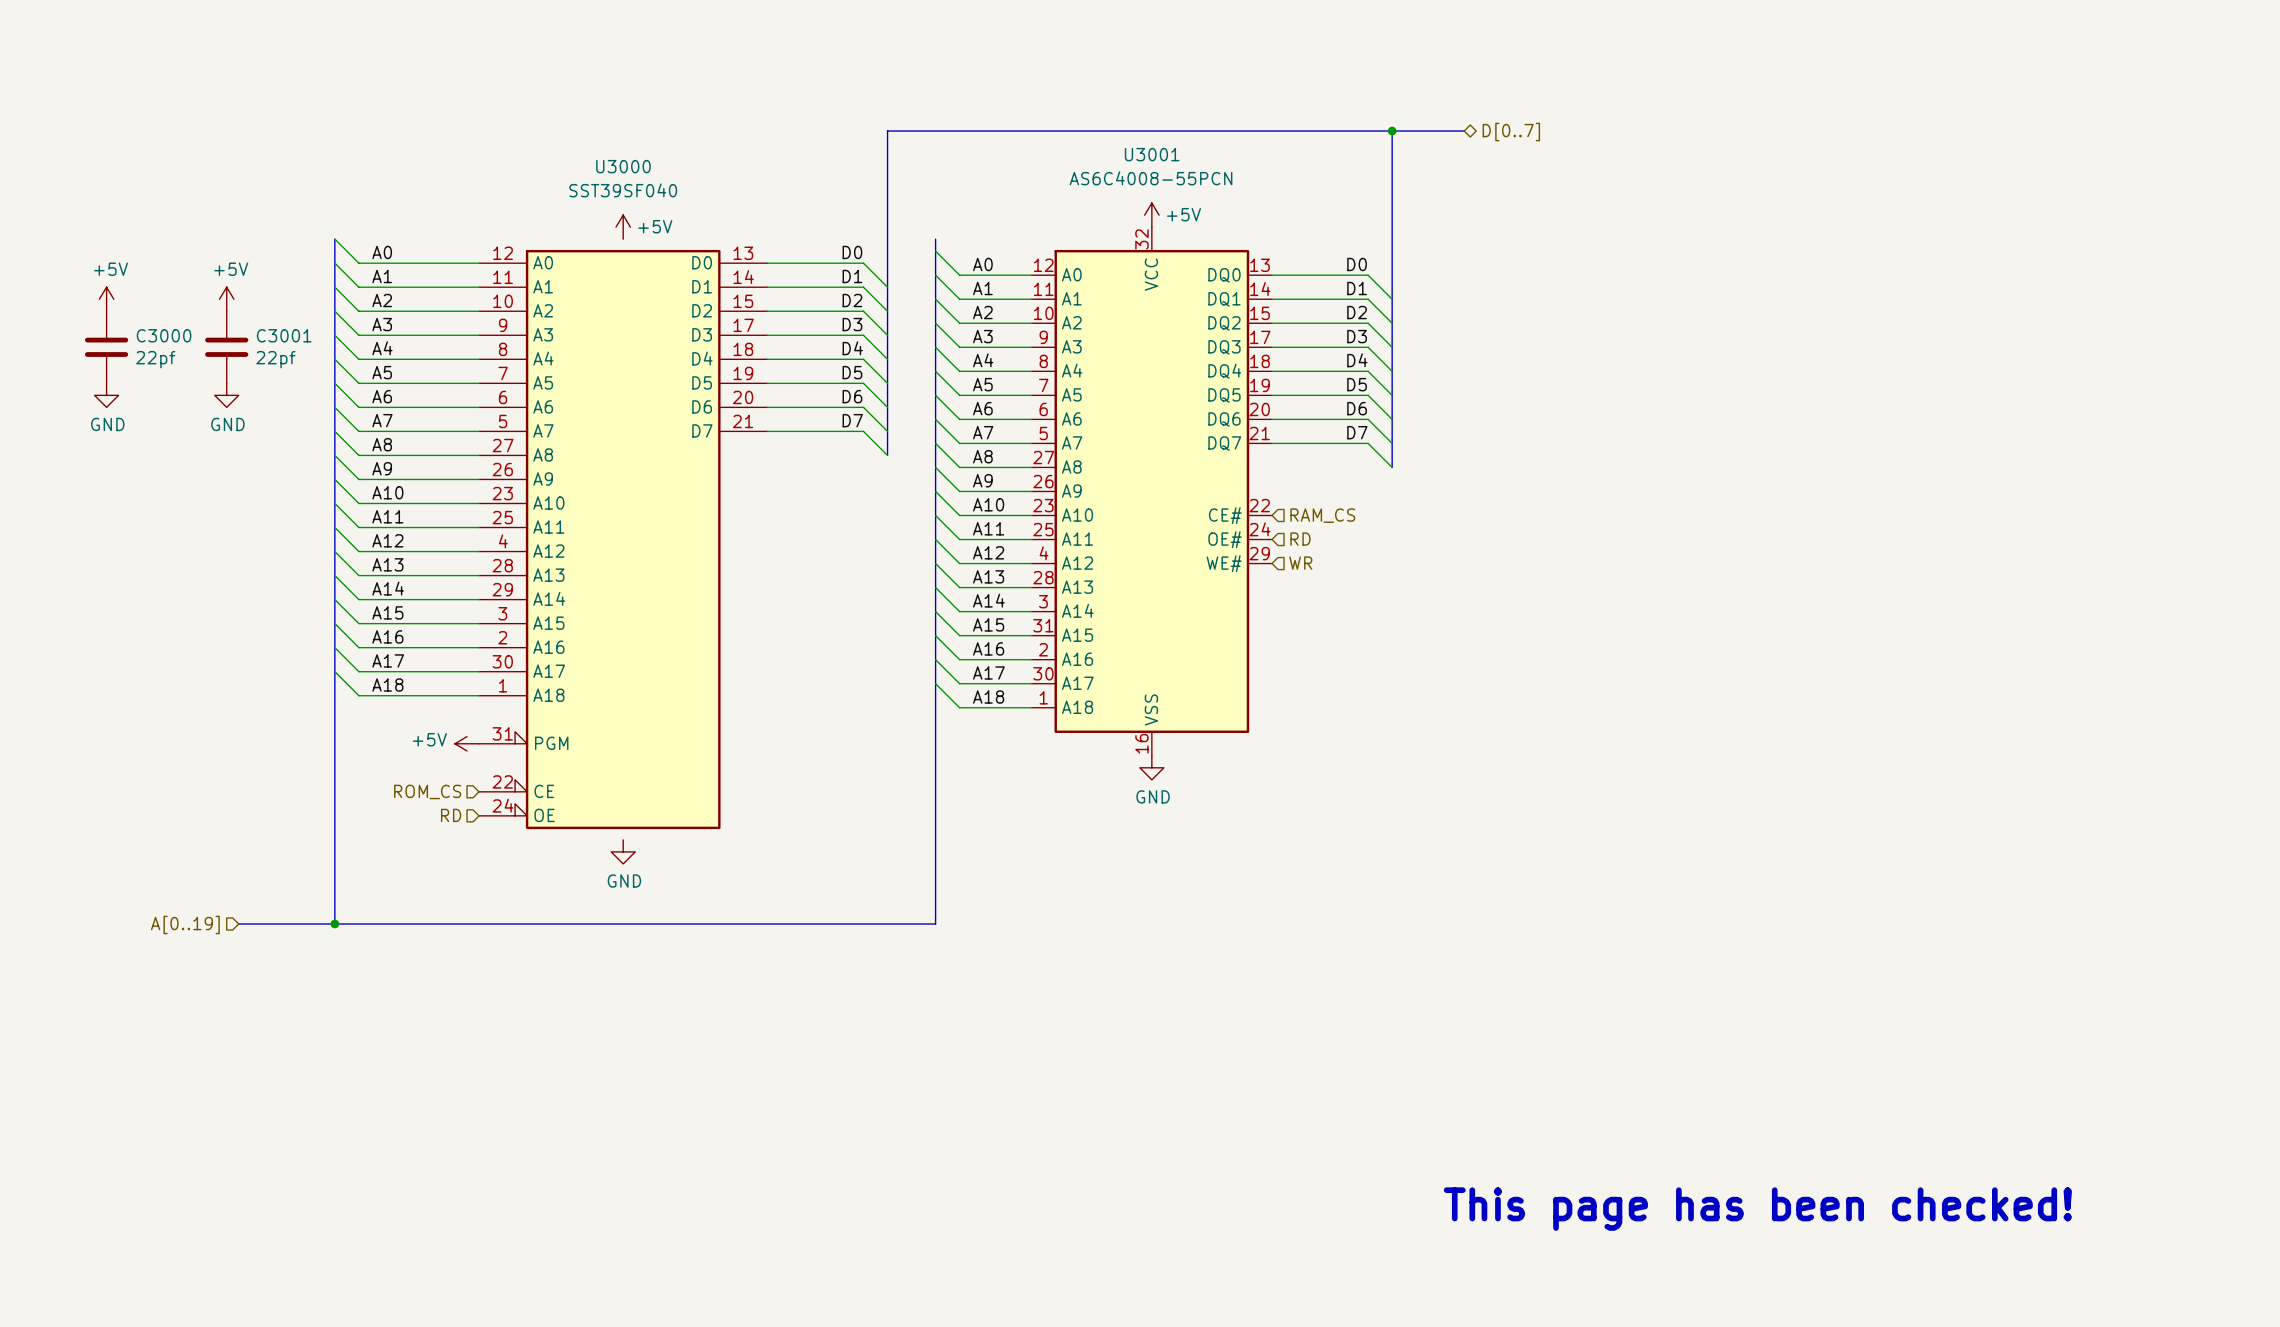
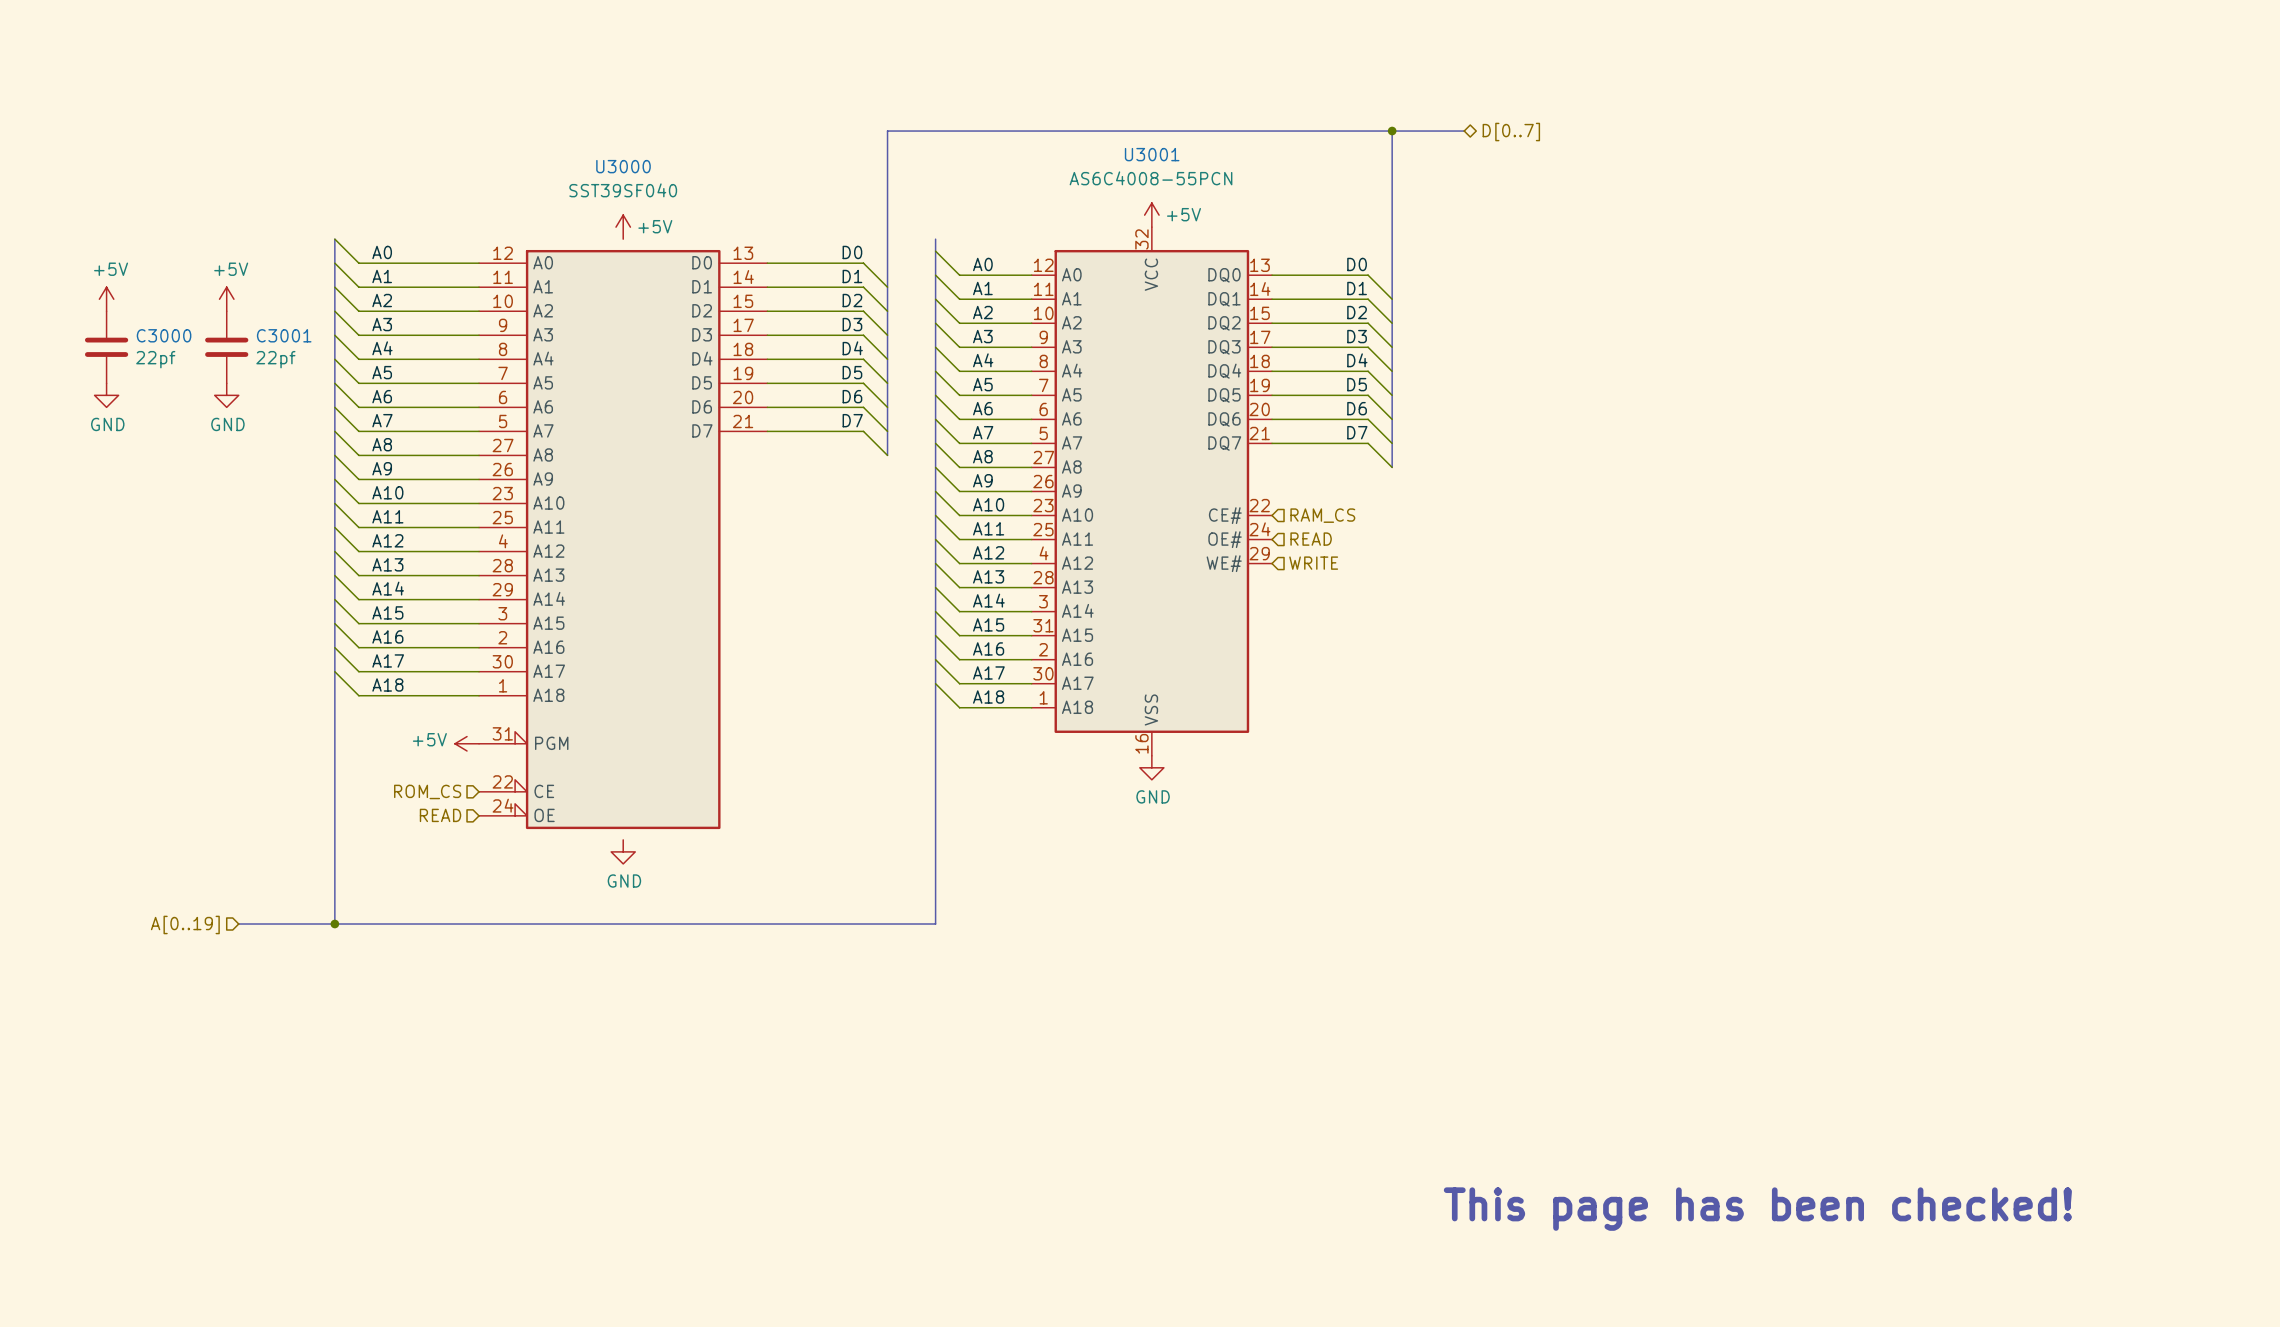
hierarchical label: RD (1300, 539) -> READ (1311, 539)
hierarchical label: WR (1300, 563) -> WRITE (1313, 563)
hierarchical label: RD (451, 815) -> READ (440, 815)

